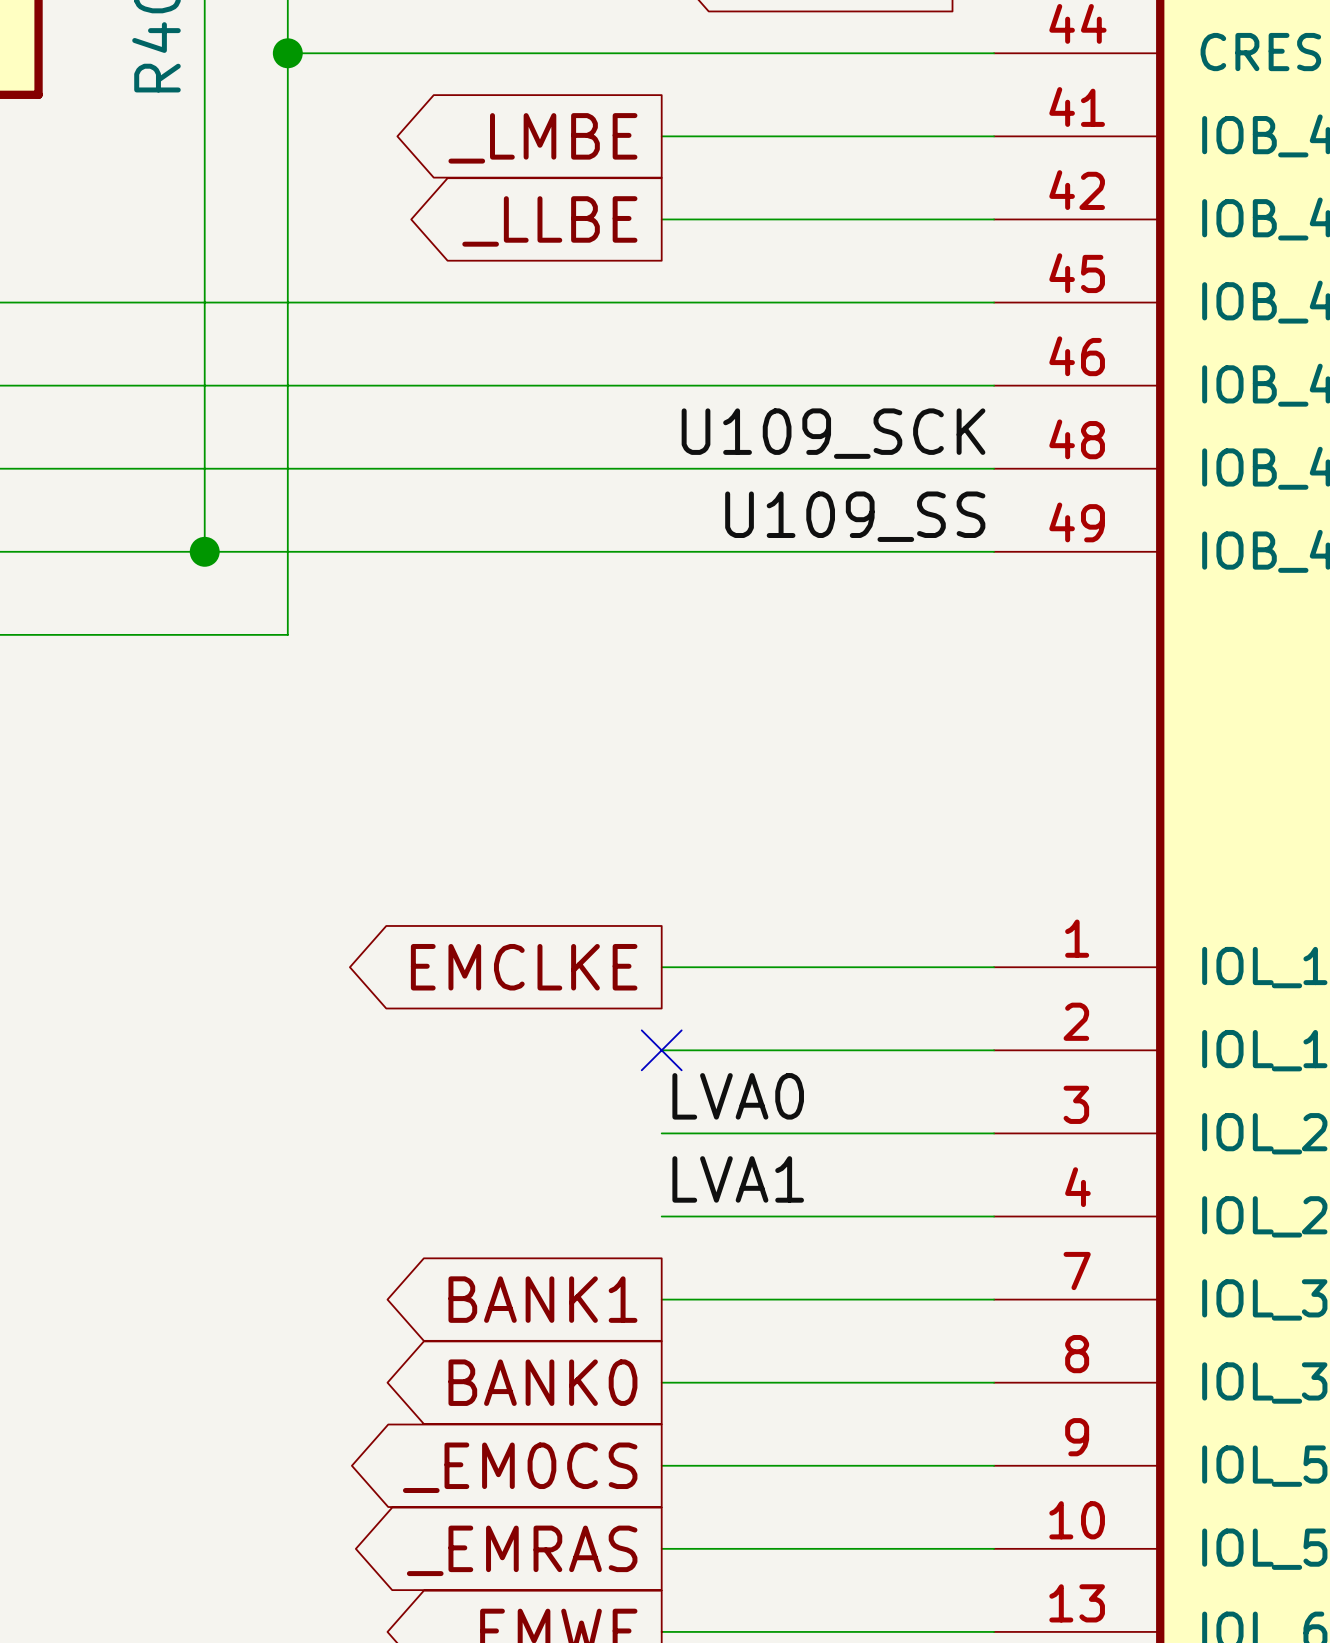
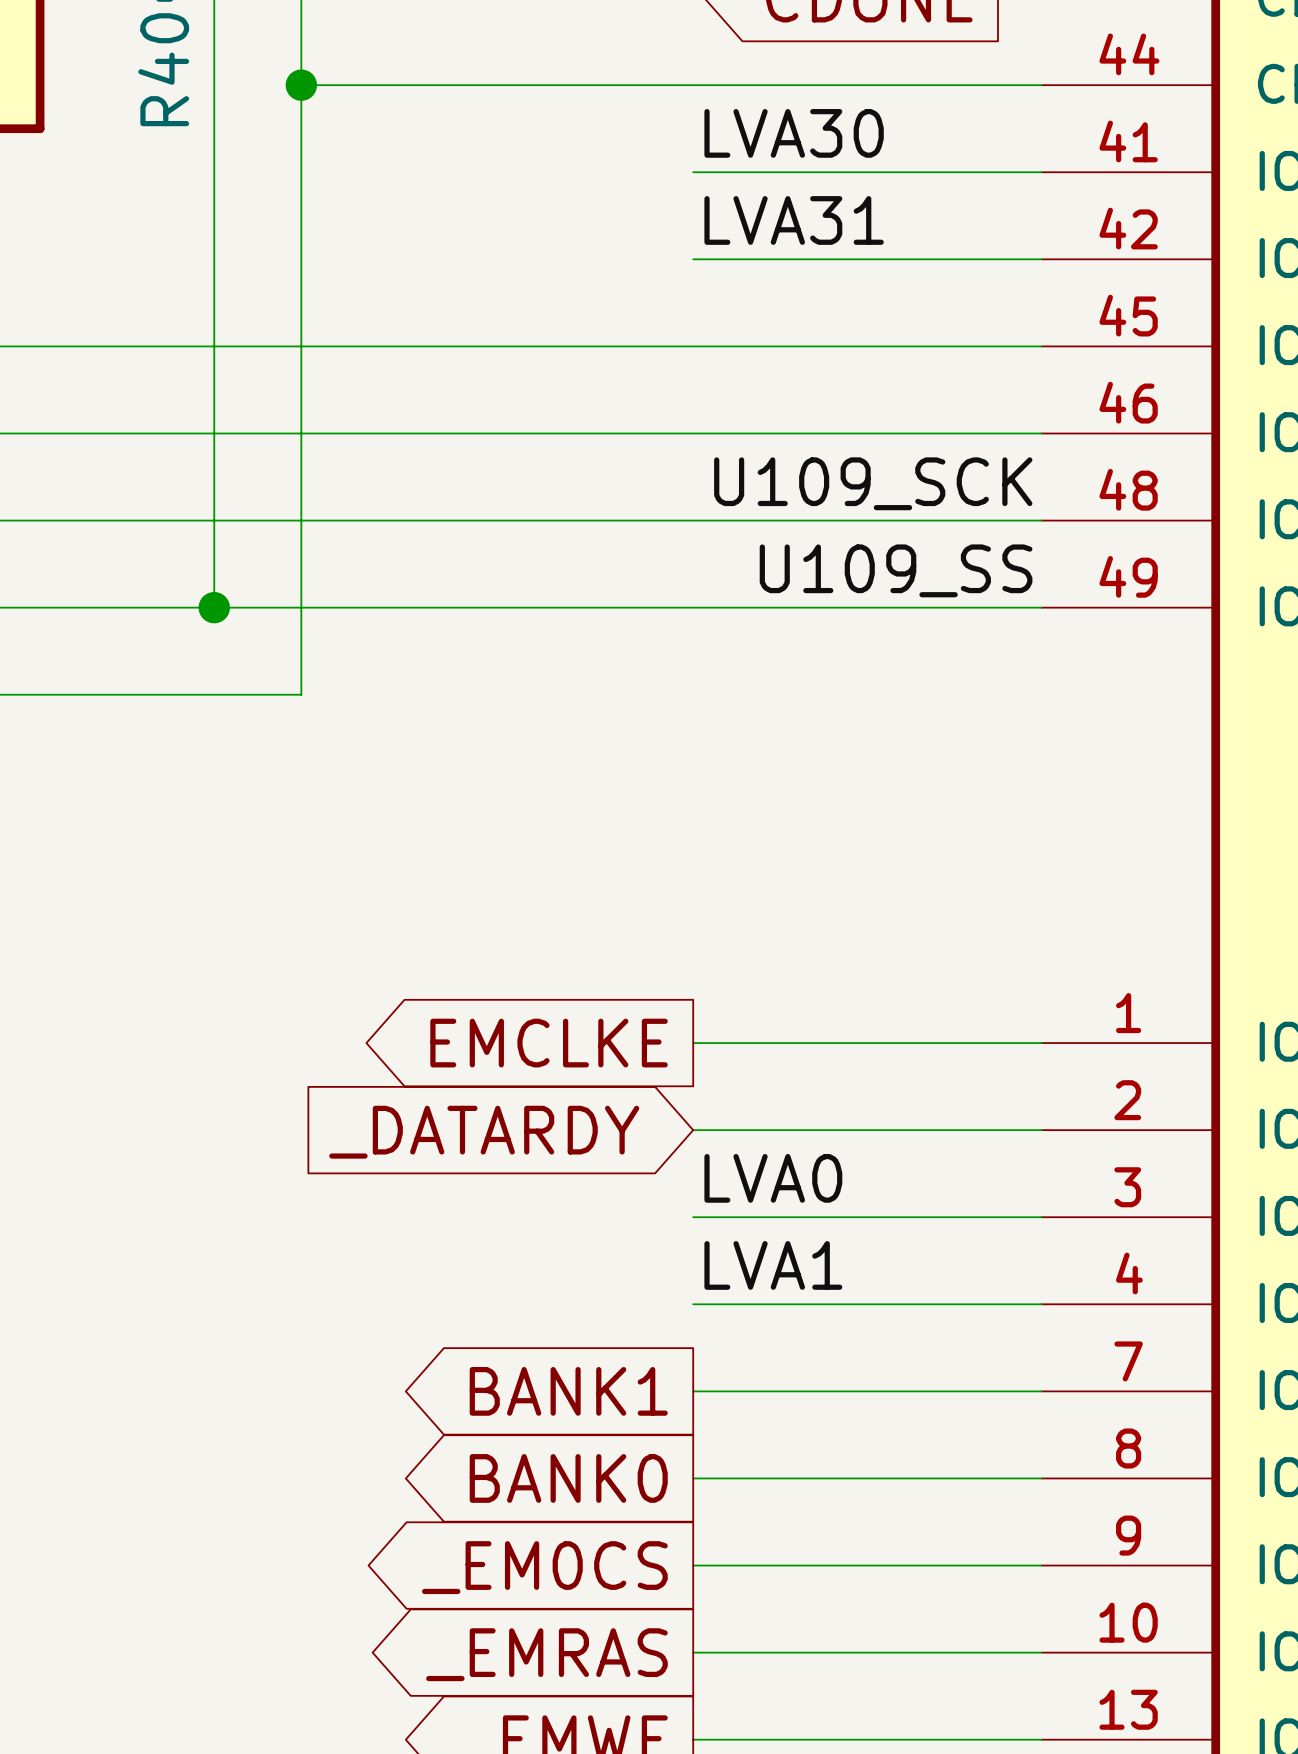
label: none -> LVA30 (794, 133)
global label: _LMBE (542, 138) -> none
label: none -> LVA31 (794, 220)
global label: _LLBE (549, 221) -> none
no-connect mark: (661, 1050) -> none
global label: none -> _DATARDY (484, 1132)

